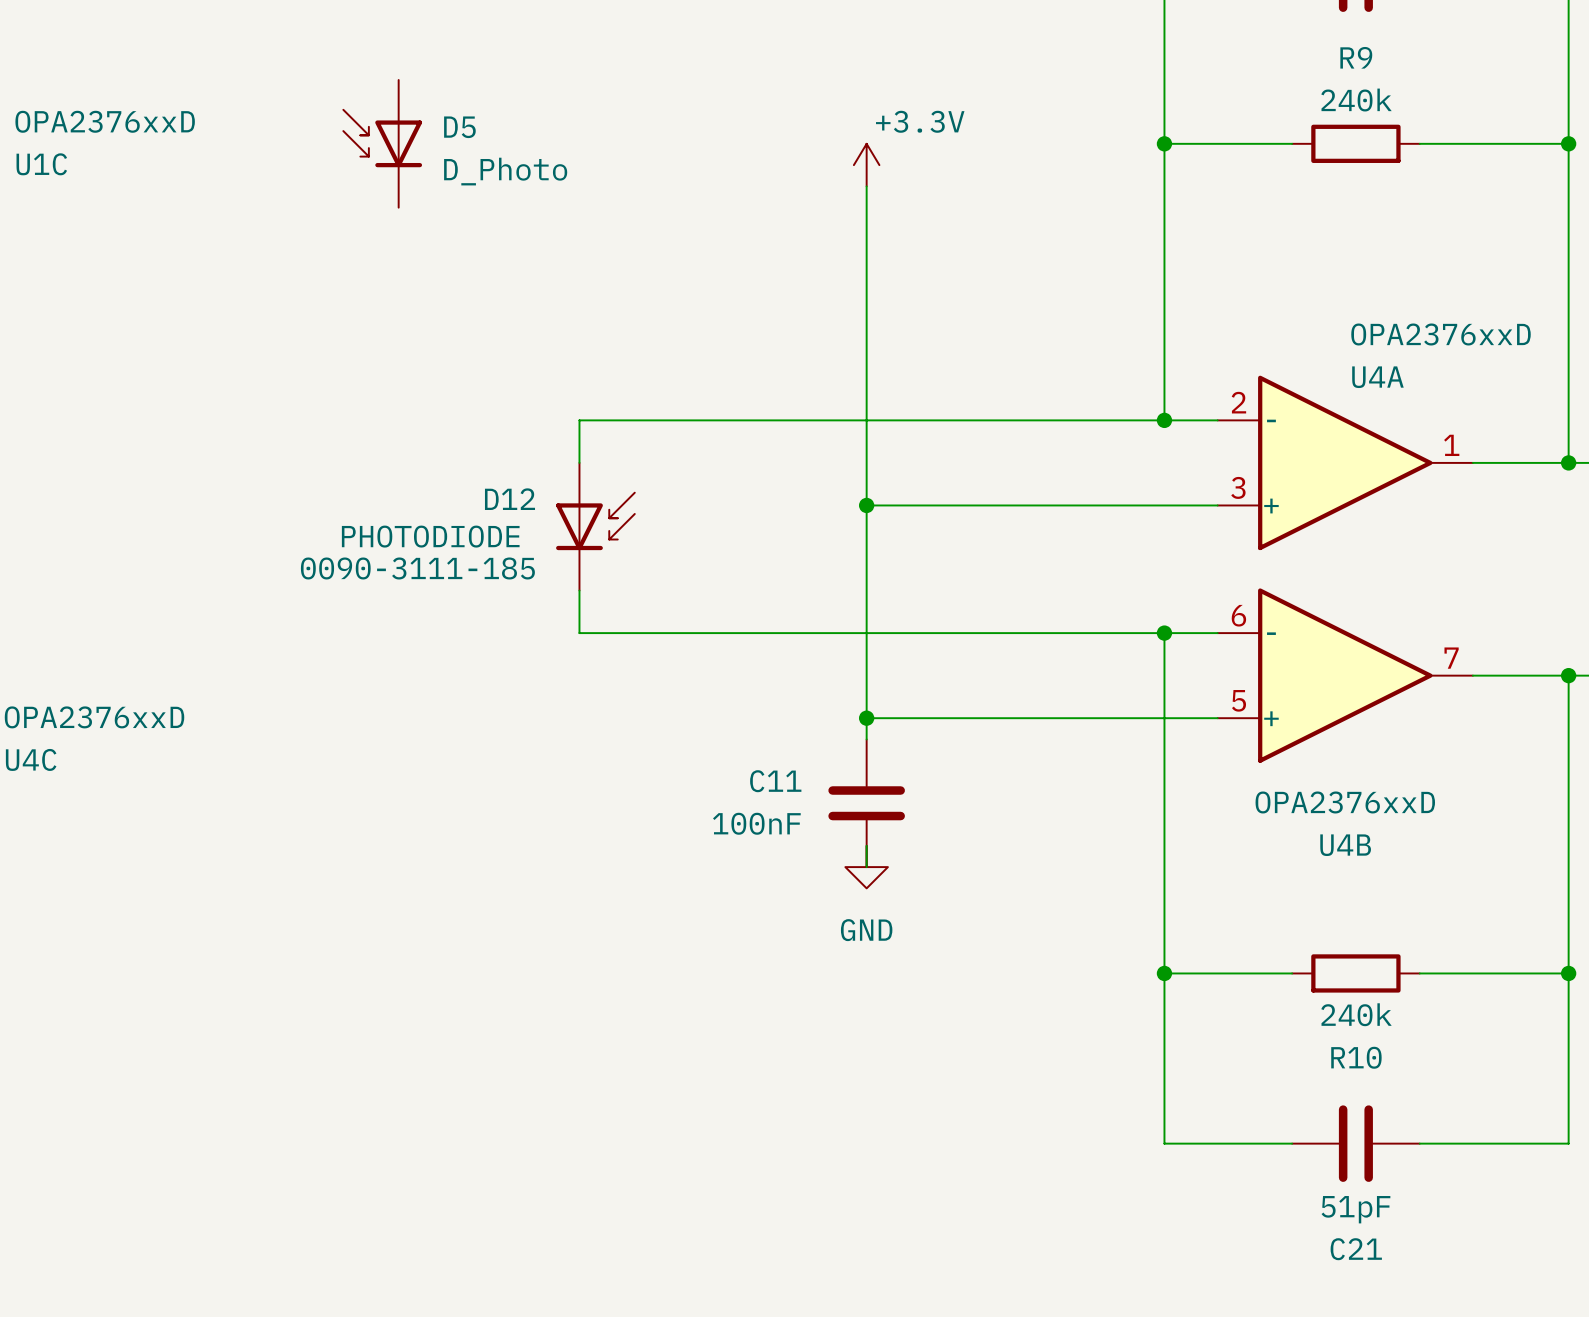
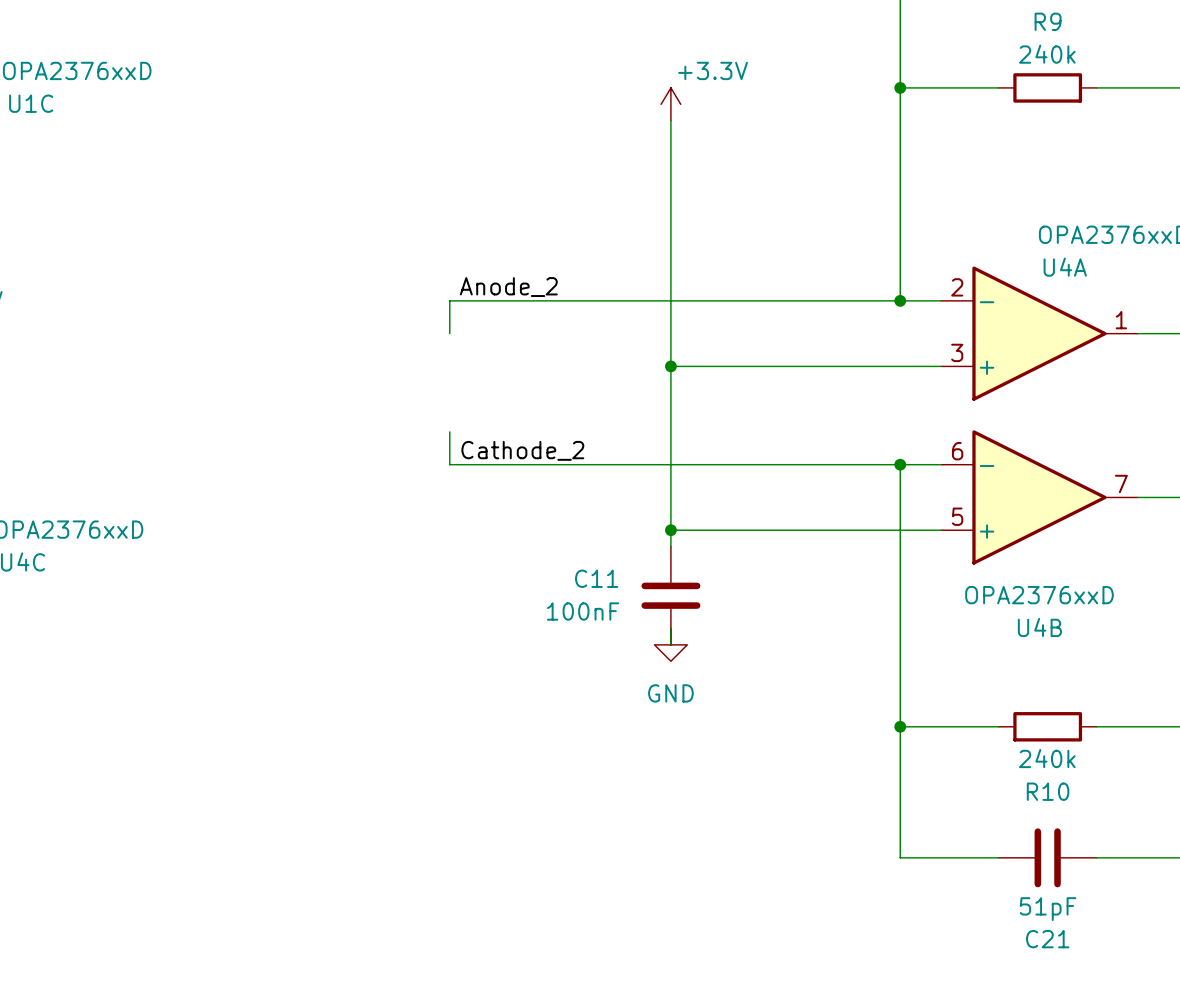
D5: D_Photo (382, 143) -> none
label: none -> Anode_2 (508, 287)
D12: 0090-3111-185 (595, 526) -> none
label: none -> Cathode_2 (522, 450)

